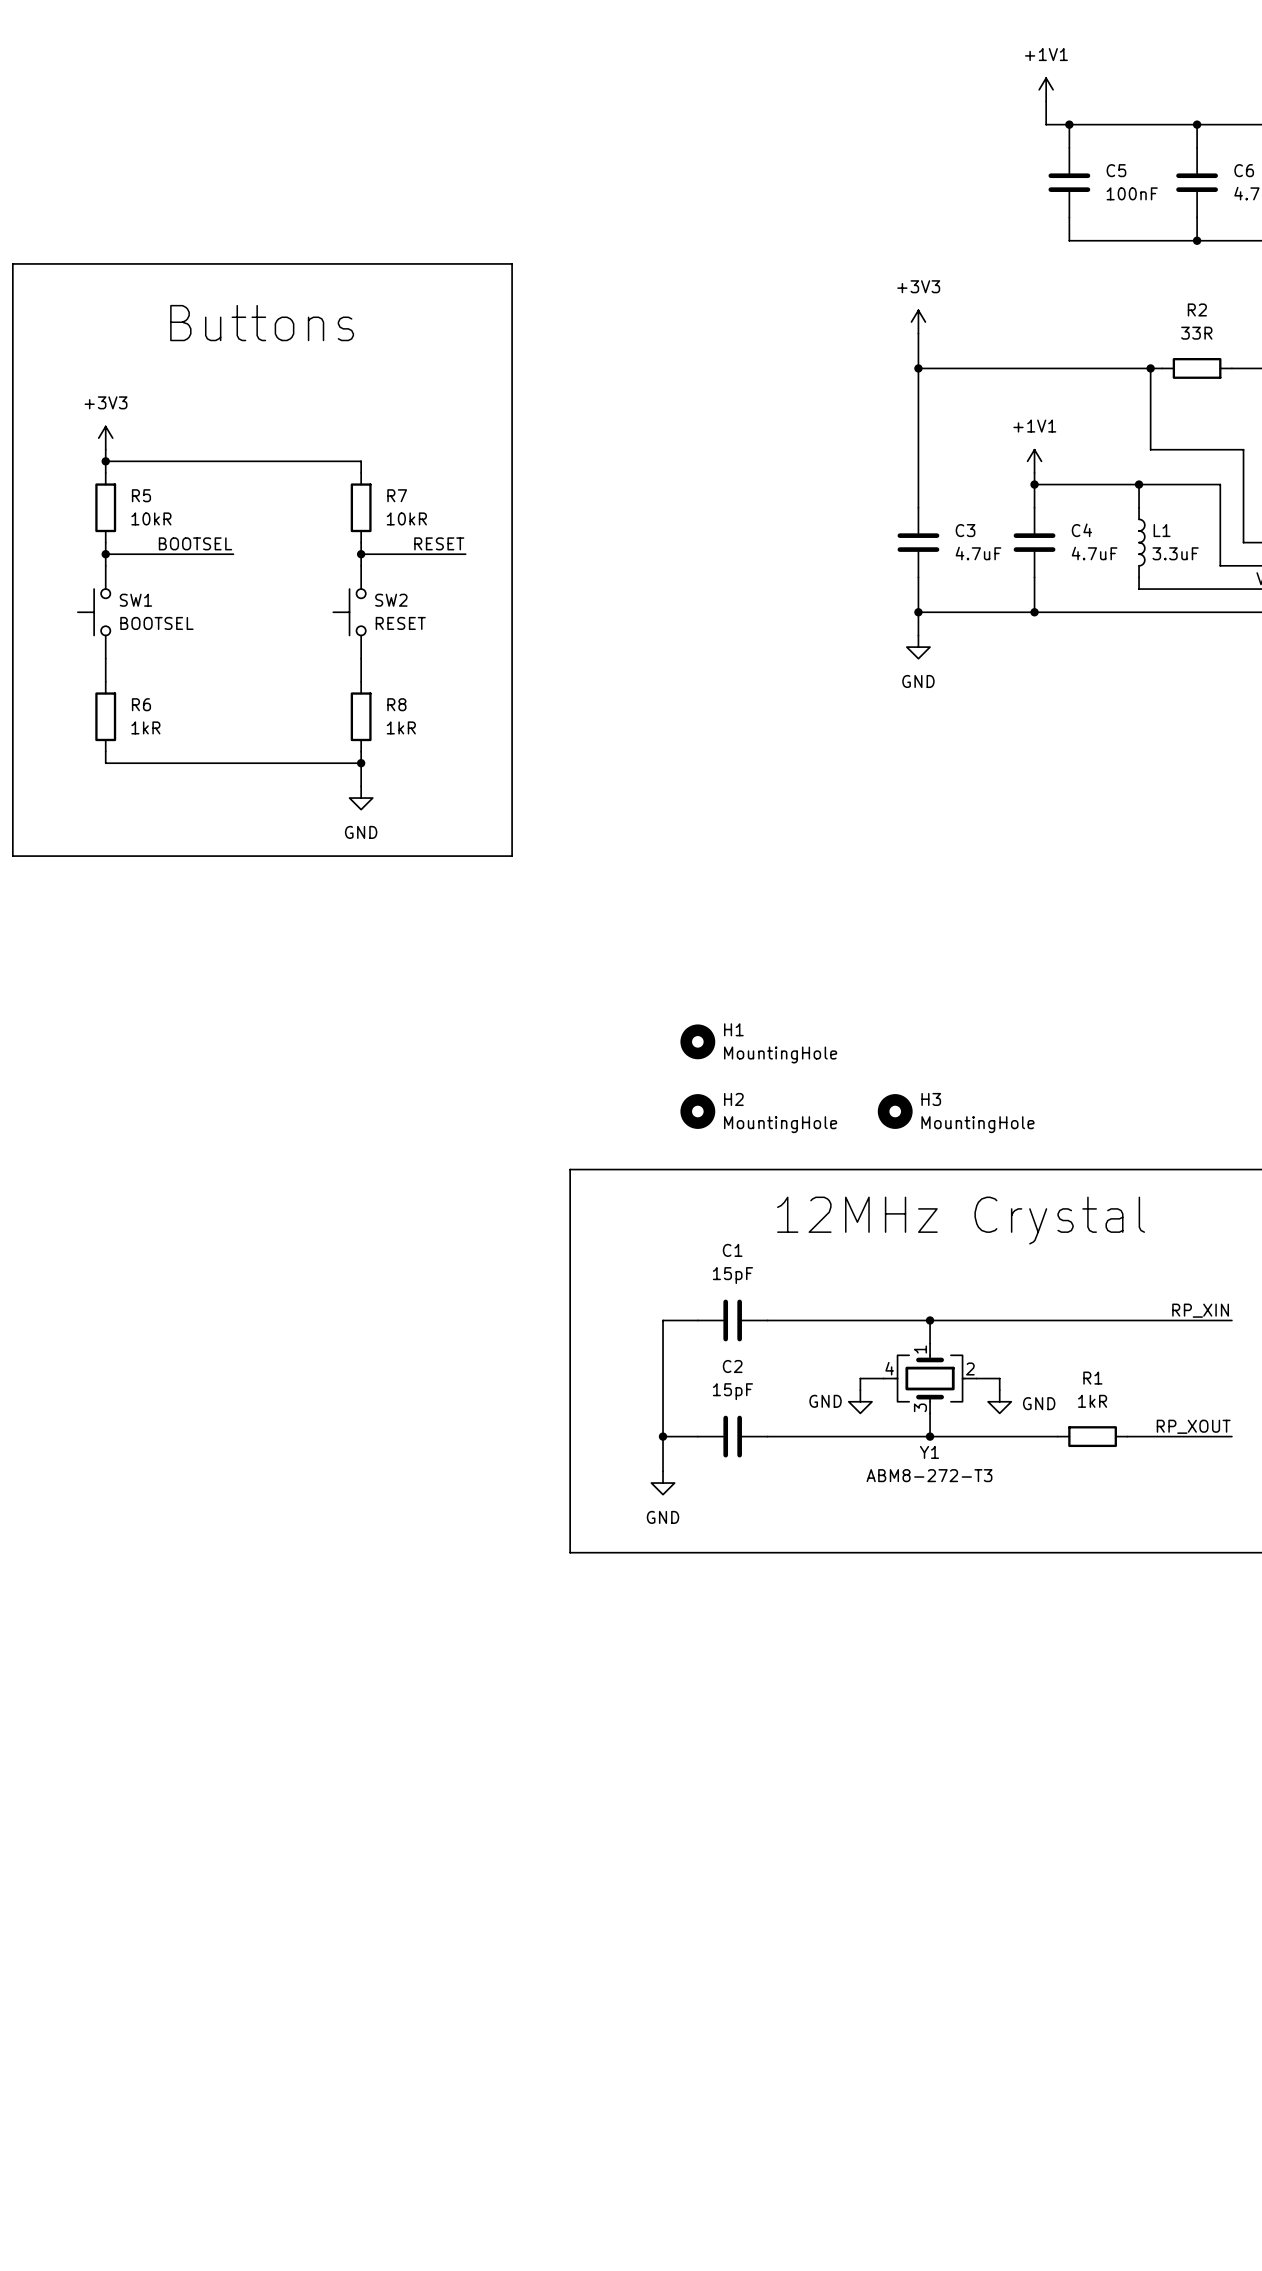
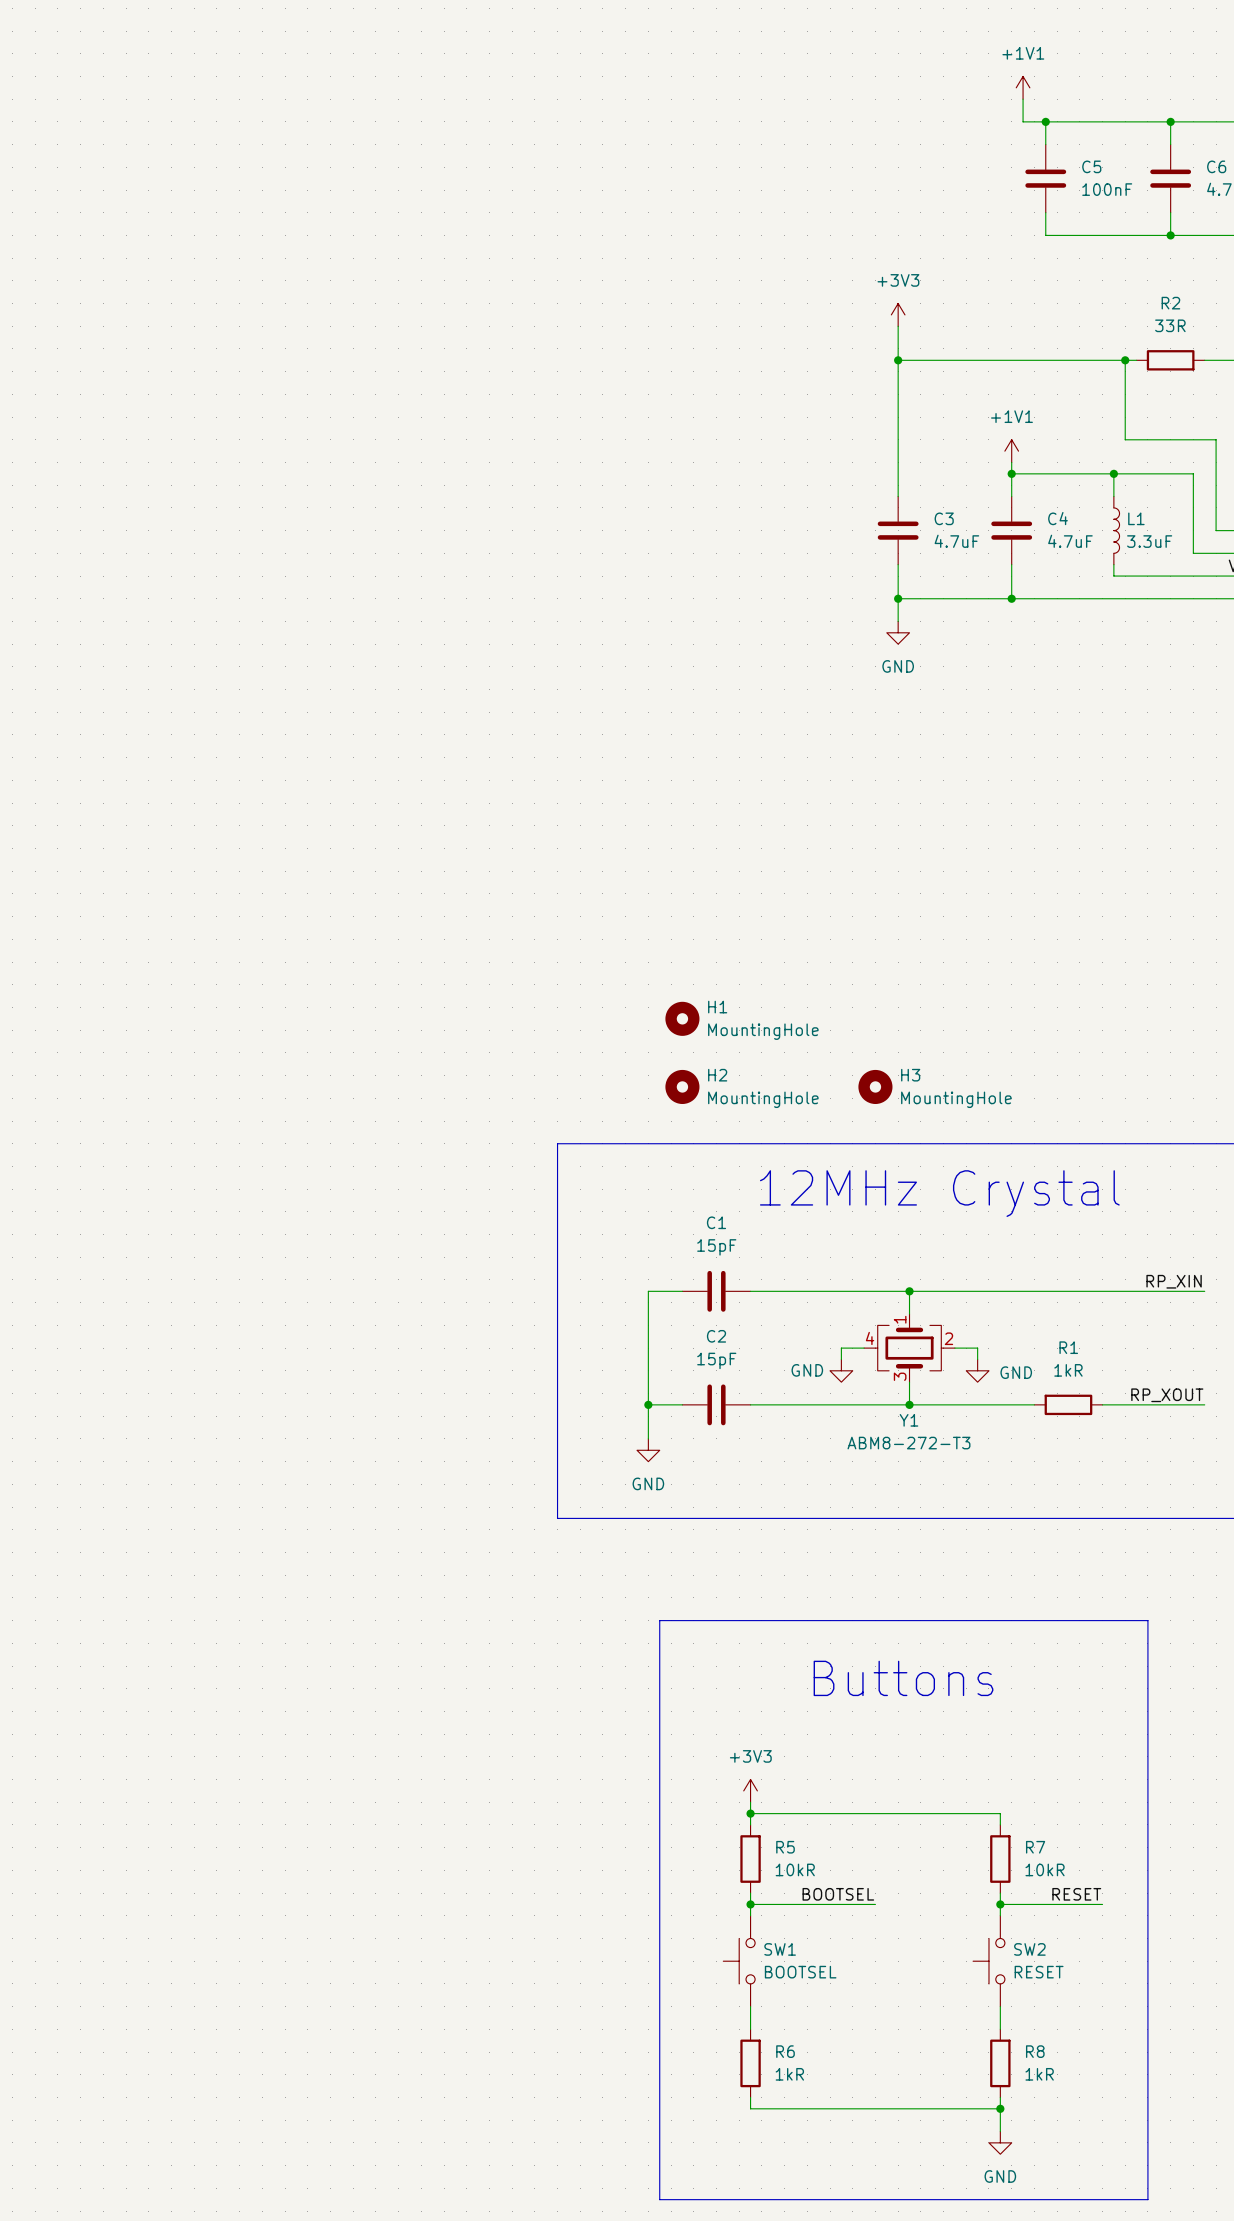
line: (12, 263) (512, 263) (512, 856) (12, 856) (12, 263) -> none
text: Buttons (262, 323) -> none
power symbol: +3V3 (105, 438) -> none
wire: (105, 449) (105, 472) -> none
wire: (105, 461) (361, 461) (361, 472) -> none
junction: (105, 461) -> none
R5 position: (105, 507) -> (750, 1859)
R7 position: (361, 507) -> (1000, 1859)
wire: (105, 542) (105, 565) -> none
wire: (361, 542) (361, 565) -> none
label: BOOTSEL (195, 543) -> none
label: RESET (439, 543) -> none
wire: (105, 554) (233, 554) -> none
junction: (105, 554) -> none
wire: (361, 554) (465, 554) -> none
junction: (361, 554) -> none
SW1 position: (94, 612) -> (739, 1961)
SW2 position: (349, 612) -> (988, 1961)
wire: (105, 658) (105, 681) -> none
wire: (361, 658) (361, 681) -> none
R6 position: (105, 716) -> (750, 2063)
R8 position: (361, 716) -> (1000, 2063)
wire: (105, 751) (105, 763) (361, 763) -> none
wire: (361, 751) (361, 786) -> none
junction: (361, 763) -> none
power symbol: GND (361, 798) -> none
line: none -> (659, 1620) (1147, 1620) (1147, 2199) (659, 2199) (659, 1620)
text: none -> Buttons (903, 1678)
power symbol: none -> +3V3 (750, 1790)
wire: none -> (750, 1802) (750, 1824)
wire: none -> (750, 1813) (1000, 1813) (1000, 1824)
junction: none -> (750, 1813)
wire: none -> (750, 1893) (750, 1915)
wire: none -> (1000, 1893) (1000, 1915)
label: none -> BOOTSEL (838, 1894)
label: none -> RESET (1076, 1894)
wire: none -> (750, 1904) (875, 1904)
junction: none -> (750, 1904)
wire: none -> (1000, 1904) (1102, 1904)
junction: none -> (1000, 1904)
wire: none -> (750, 2006) (750, 2029)
wire: none -> (1000, 2006) (1000, 2029)
wire: none -> (750, 2097) (750, 2108) (1000, 2108)
wire: none -> (1000, 2097) (1000, 2131)
junction: none -> (1000, 2108)
power symbol: none -> GND (1000, 2142)

